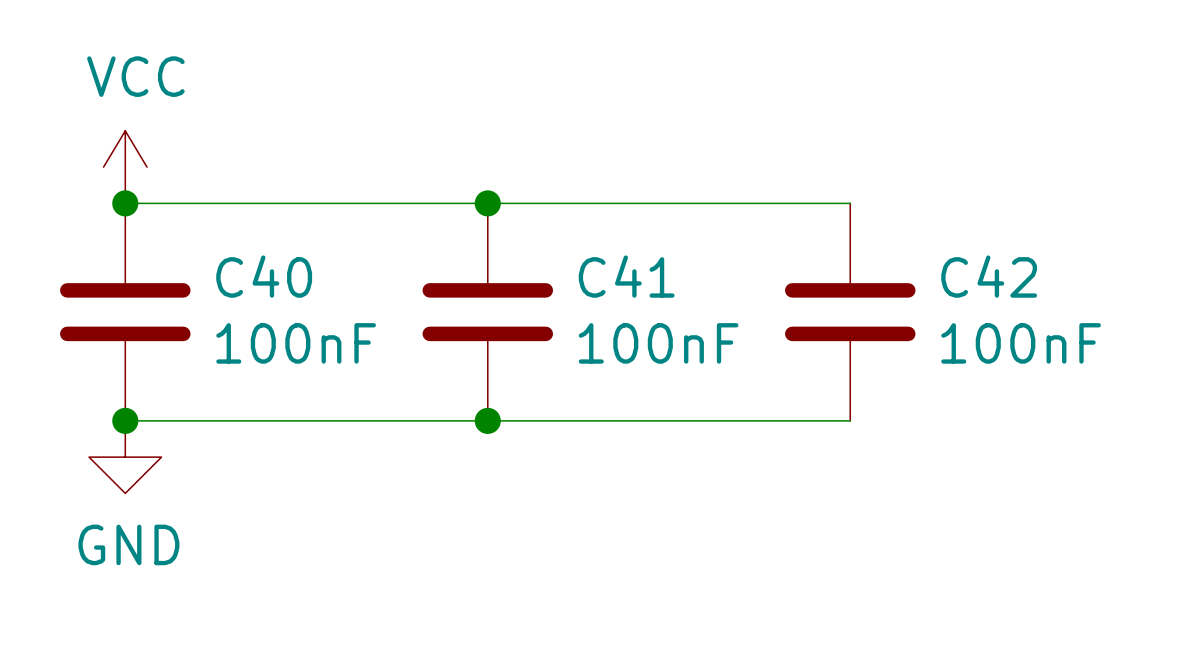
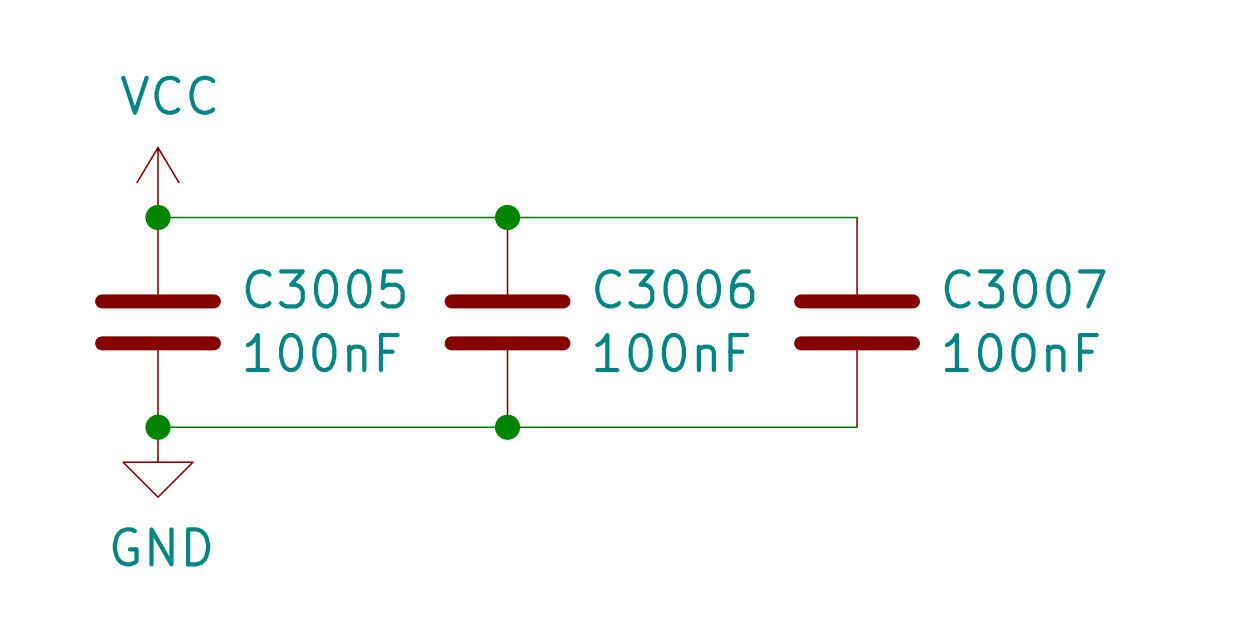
C40 name: C40 (264, 276) -> C3005 (325, 288)
C41 name: C41 (626, 276) -> C3006 (674, 288)
C42 name: C42 (989, 276) -> C3007 (1025, 288)

